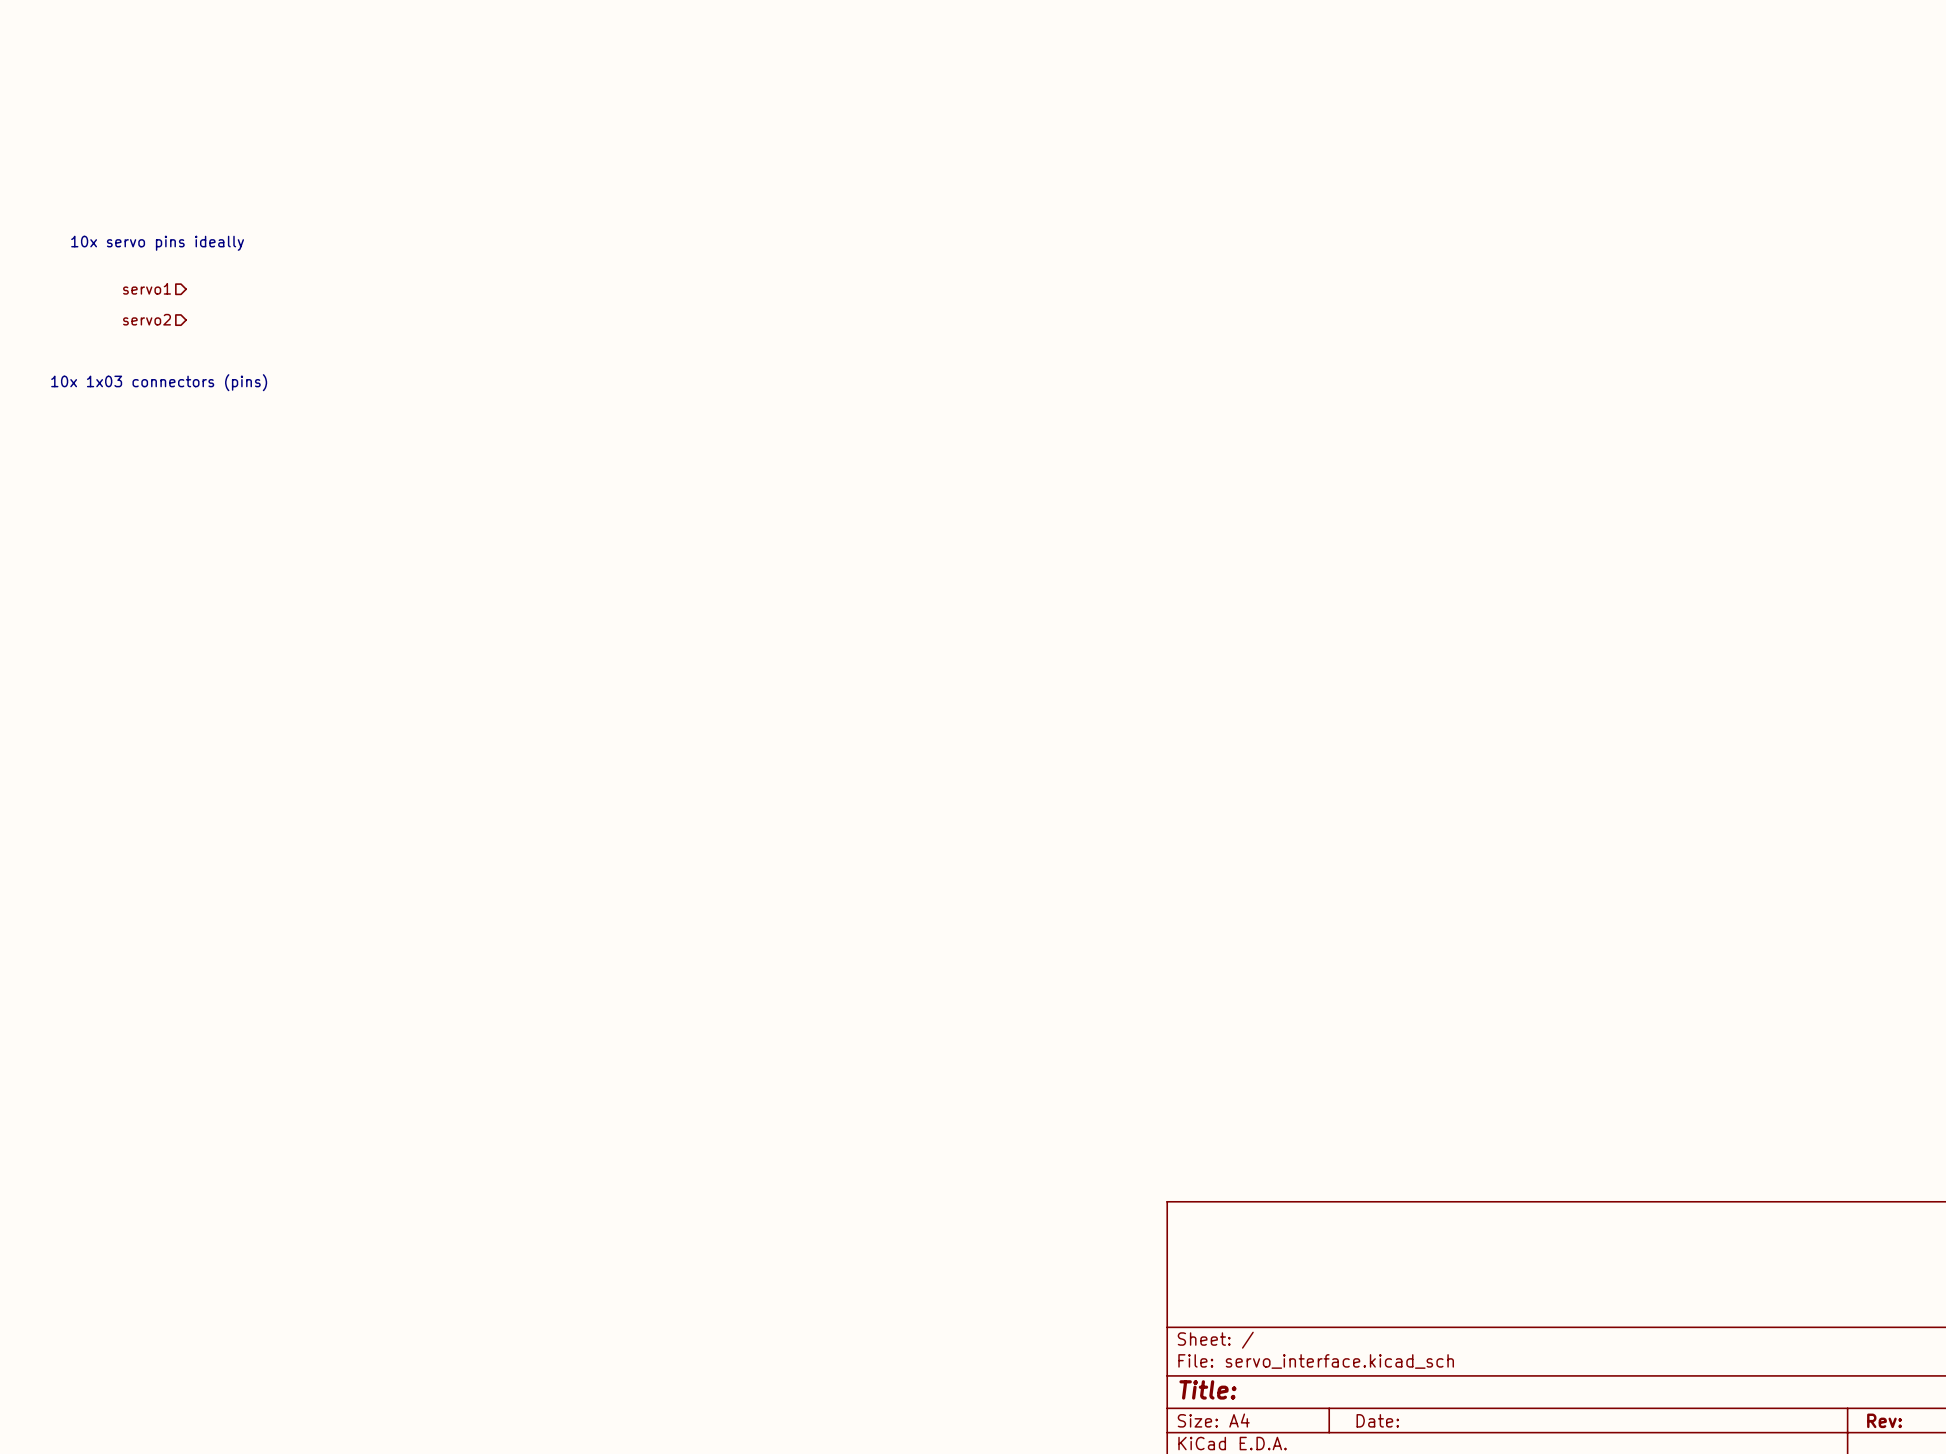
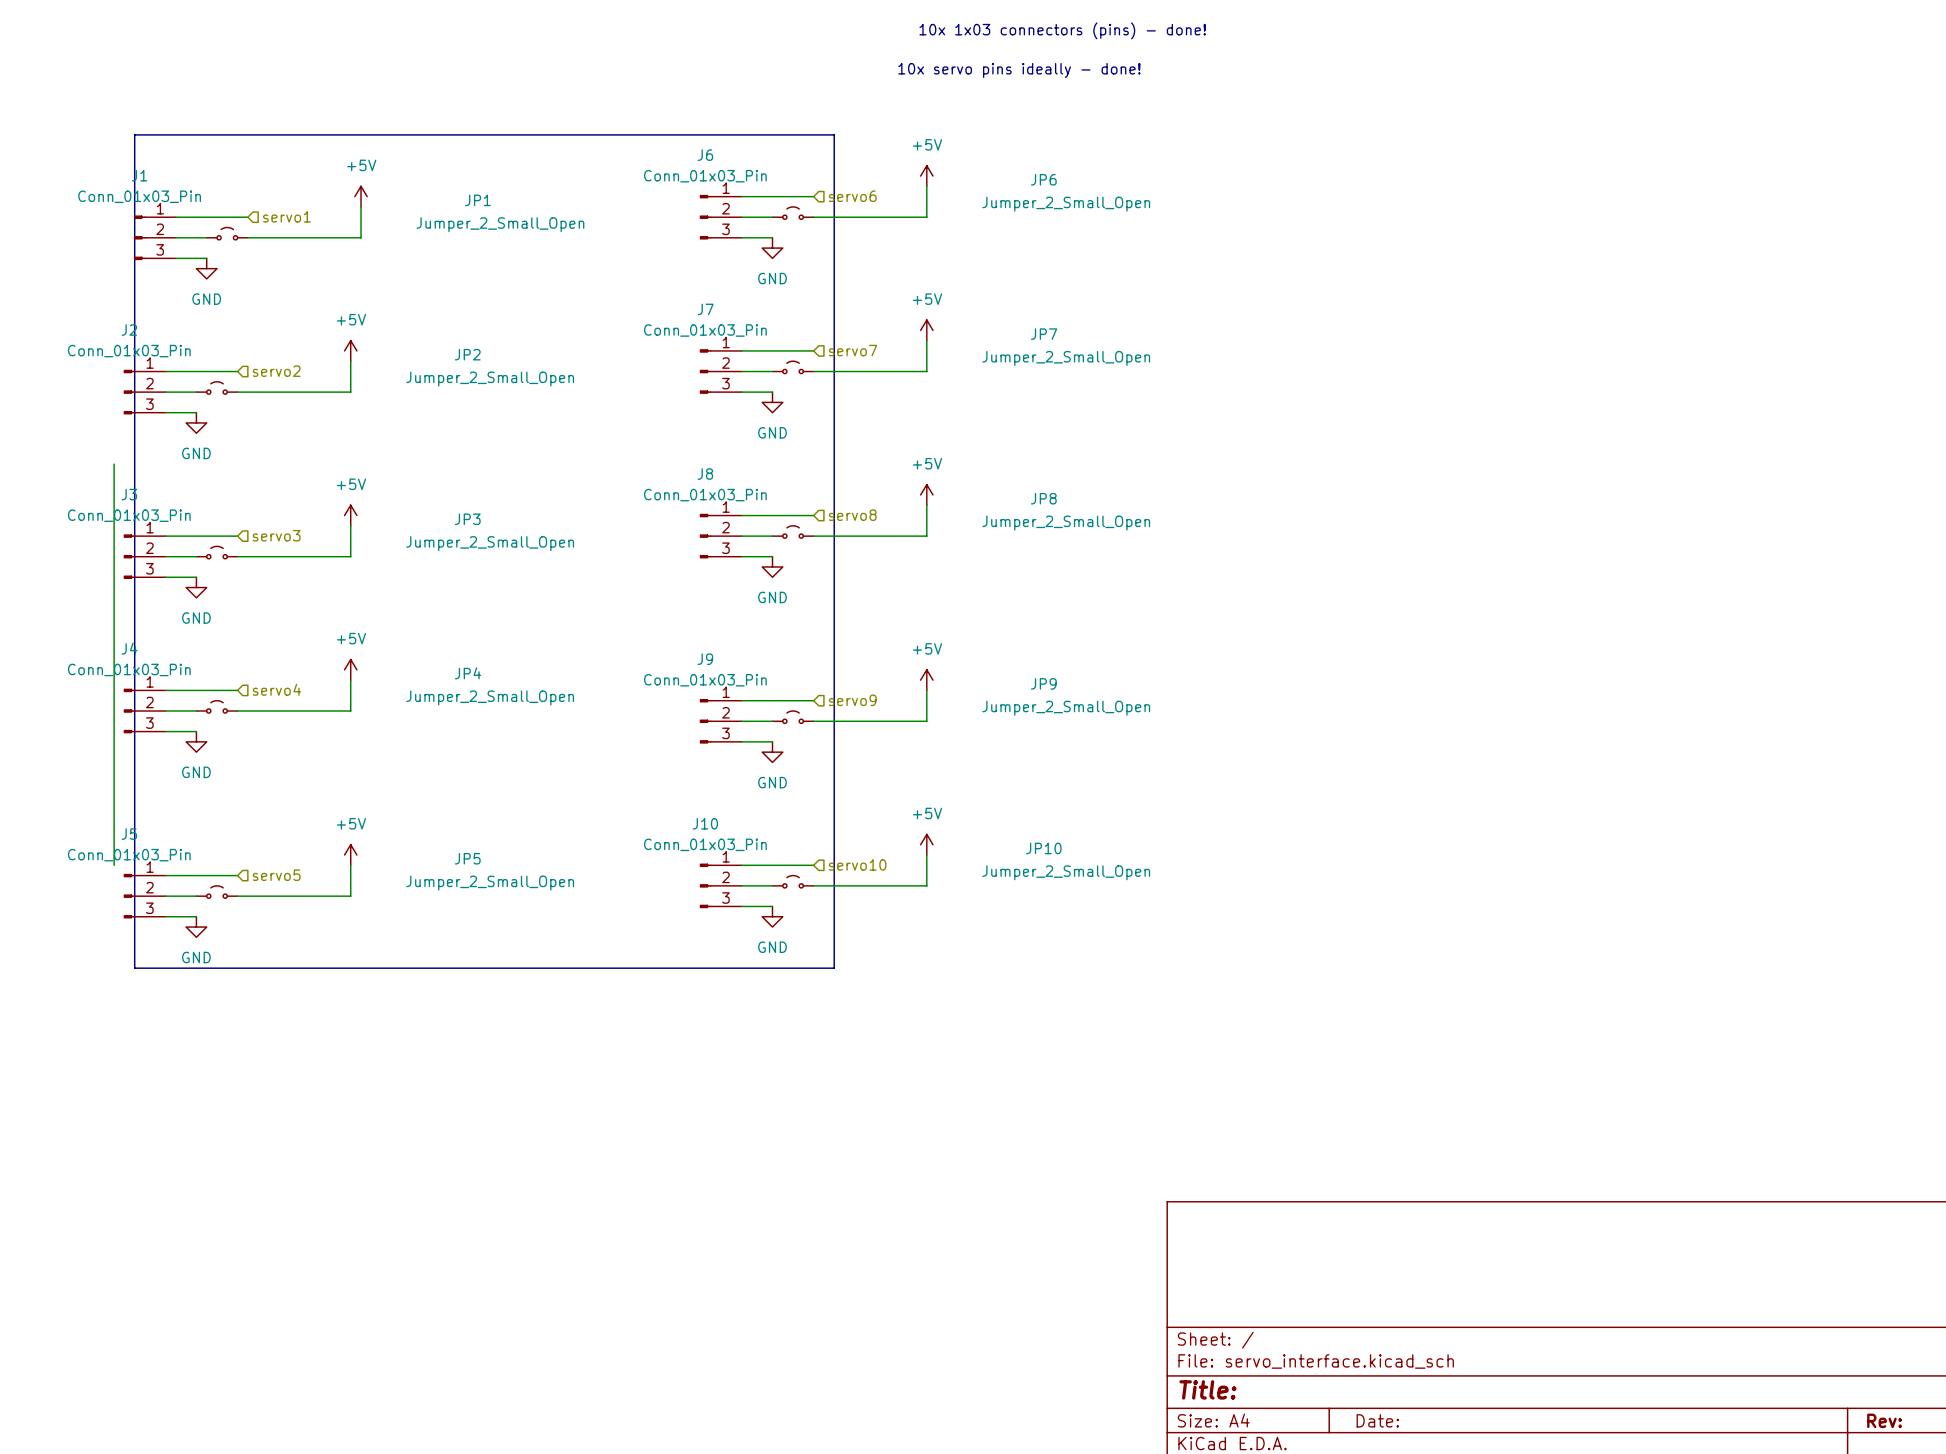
text: none -> 10x 1x03 connectors (pins) - done! (1062, 30)
text: none -> 10x servo pins ideally - done! (1019, 70)
line: none -> (134, 134) (834, 134) (834, 968) (134, 968) (134, 134)
power symbol: none -> +5V (926, 176)
wire: none -> (926, 186) (926, 217) (813, 217)
power symbol: none -> +5V (361, 196)
wire: none -> (741, 196) (813, 196)
hierarchical label: none -> servo6 (852, 196)
wire: none -> (361, 206) (361, 237) (247, 237)
JP6: none -> Jumper_2_Small_Open (793, 213)
wire: none -> (175, 217) (247, 217)
J6: none -> Conn_01x03_Pin (720, 217)
wire: none -> (741, 217) (772, 217)
JP1: none -> Jumper_2_Small_Open (227, 233)
J1: none -> Conn_01x03_Pin (154, 237)
wire: none -> (175, 237) (206, 237)
wire: none -> (741, 237) (772, 237)
text: 10x servo pins ideally (157, 243) -> none
power symbol: none -> GND (772, 248)
wire: none -> (175, 258) (206, 258)
power symbol: none -> GND (206, 268)
hierarchical label rotation: 0° (147, 288) -> 180° (286, 216)
hierarchical label position: servo1 (147, 288) -> servo1 (286, 216)
hierarchical label rotation: 0° (147, 319) -> 180° (276, 371)
hierarchical label position: servo2 (147, 319) -> servo2 (276, 371)
power symbol: none -> +5V (926, 330)
wire: none -> (926, 340) (926, 371) (813, 371)
power symbol: none -> +5V (350, 350)
wire: none -> (741, 350) (813, 350)
hierarchical label: none -> servo7 (853, 350)
wire: none -> (350, 361) (350, 392) (237, 392)
JP7: none -> Jumper_2_Small_Open (793, 367)
wire: none -> (165, 371) (237, 371)
J7: none -> Conn_01x03_Pin (720, 371)
wire: none -> (741, 371) (772, 371)
text: 10x 1x03 connectors (pins) (159, 382) -> none
JP2: none -> Jumper_2_Small_Open (217, 387)
J2: none -> Conn_01x03_Pin (144, 392)
wire: none -> (165, 392) (196, 392)
wire: none -> (741, 392) (772, 392)
power symbol: none -> GND (772, 402)
wire: none -> (165, 412) (196, 412)
power symbol: none -> GND (196, 422)
wire: none -> (114, 464) (114, 865)
power symbol: none -> +5V (926, 494)
wire: none -> (926, 505) (926, 536) (813, 536)
power symbol: none -> +5V (350, 515)
wire: none -> (741, 515) (813, 515)
hierarchical label: none -> servo8 (852, 515)
wire: none -> (350, 525) (350, 556) (237, 556)
JP8: none -> Jumper_2_Small_Open (793, 531)
hierarchical label: none -> servo3 (276, 535)
wire: none -> (165, 536) (237, 536)
J8: none -> Conn_01x03_Pin (720, 536)
wire: none -> (741, 536) (772, 536)
JP3: none -> Jumper_2_Small_Open (217, 552)
J3: none -> Conn_01x03_Pin (144, 556)
wire: none -> (165, 556) (196, 556)
wire: none -> (741, 556) (772, 556)
power symbol: none -> GND (772, 566)
wire: none -> (165, 577) (196, 577)
power symbol: none -> GND (196, 587)
power symbol: none -> +5V (350, 669)
wire: none -> (350, 680) (350, 711) (237, 711)
power symbol: none -> +5V (926, 680)
hierarchical label: none -> servo4 (276, 689)
wire: none -> (165, 690) (237, 690)
wire: none -> (926, 690) (926, 721) (813, 721)
wire: none -> (741, 700) (813, 700)
hierarchical label: none -> servo9 (852, 700)
JP4: none -> Jumper_2_Small_Open (217, 706)
J4: none -> Conn_01x03_Pin (144, 711)
wire: none -> (165, 711) (196, 711)
JP9: none -> Jumper_2_Small_Open (793, 717)
J9: none -> Conn_01x03_Pin (720, 721)
wire: none -> (741, 721) (772, 721)
wire: none -> (165, 731) (196, 731)
power symbol: none -> GND (196, 741)
wire: none -> (741, 741) (772, 741)
power symbol: none -> GND (772, 752)
power symbol: none -> +5V (926, 844)
power symbol: none -> +5V (350, 855)
wire: none -> (926, 855) (926, 885) (813, 885)
hierarchical label: none -> servo10 (857, 864)
wire: none -> (350, 865) (350, 896) (237, 896)
wire: none -> (741, 865) (813, 865)
wire: none -> (165, 875) (237, 875)
hierarchical label: none -> servo5 (276, 875)
JP10: none -> Jumper_2_Small_Open (793, 881)
J10: none -> Conn_01x03_Pin (720, 885)
wire: none -> (741, 885) (772, 885)
JP5: none -> Jumper_2_Small_Open (217, 892)
J5: none -> Conn_01x03_Pin (144, 896)
wire: none -> (165, 896) (196, 896)
wire: none -> (741, 906) (772, 906)
wire: none -> (165, 916) (196, 916)
power symbol: none -> GND (772, 916)
power symbol: none -> GND (196, 927)

